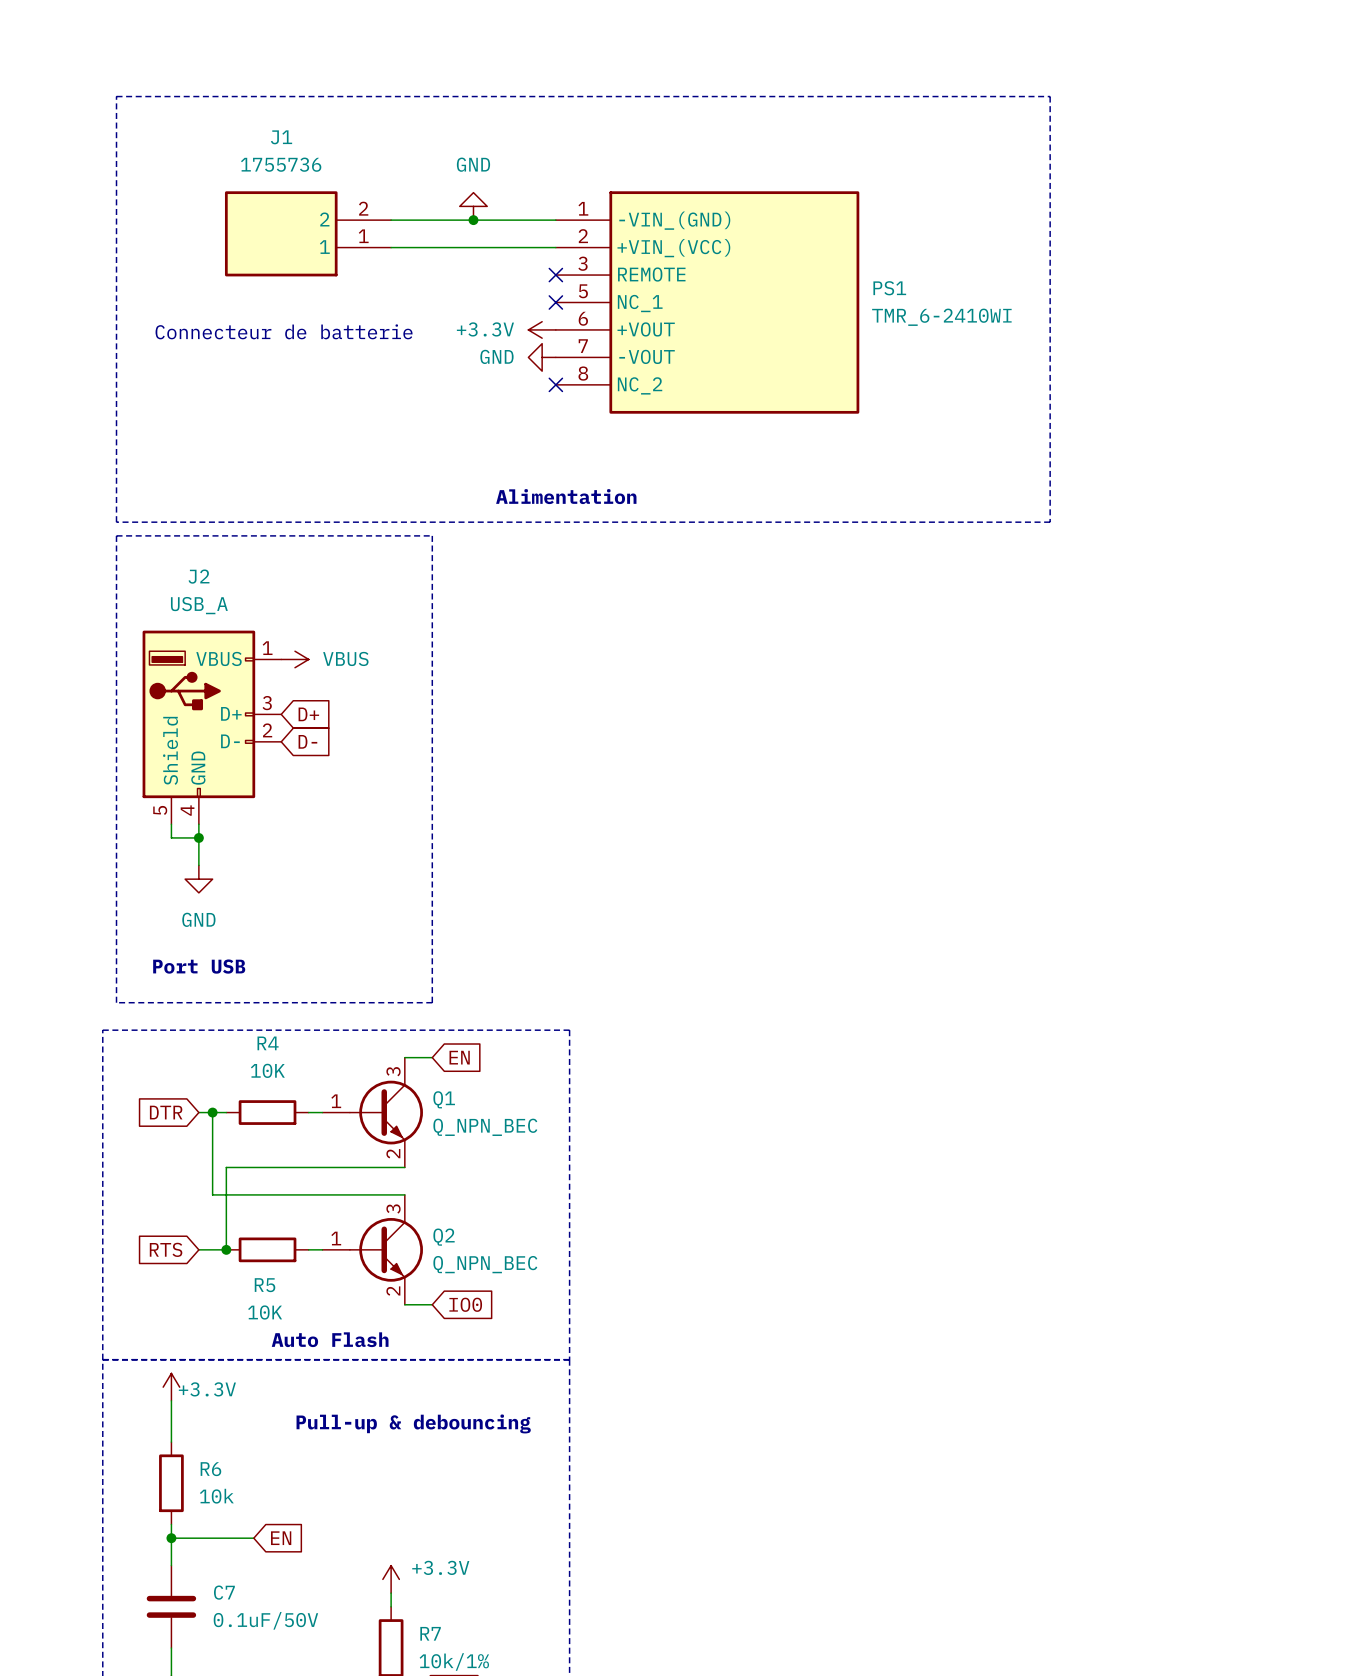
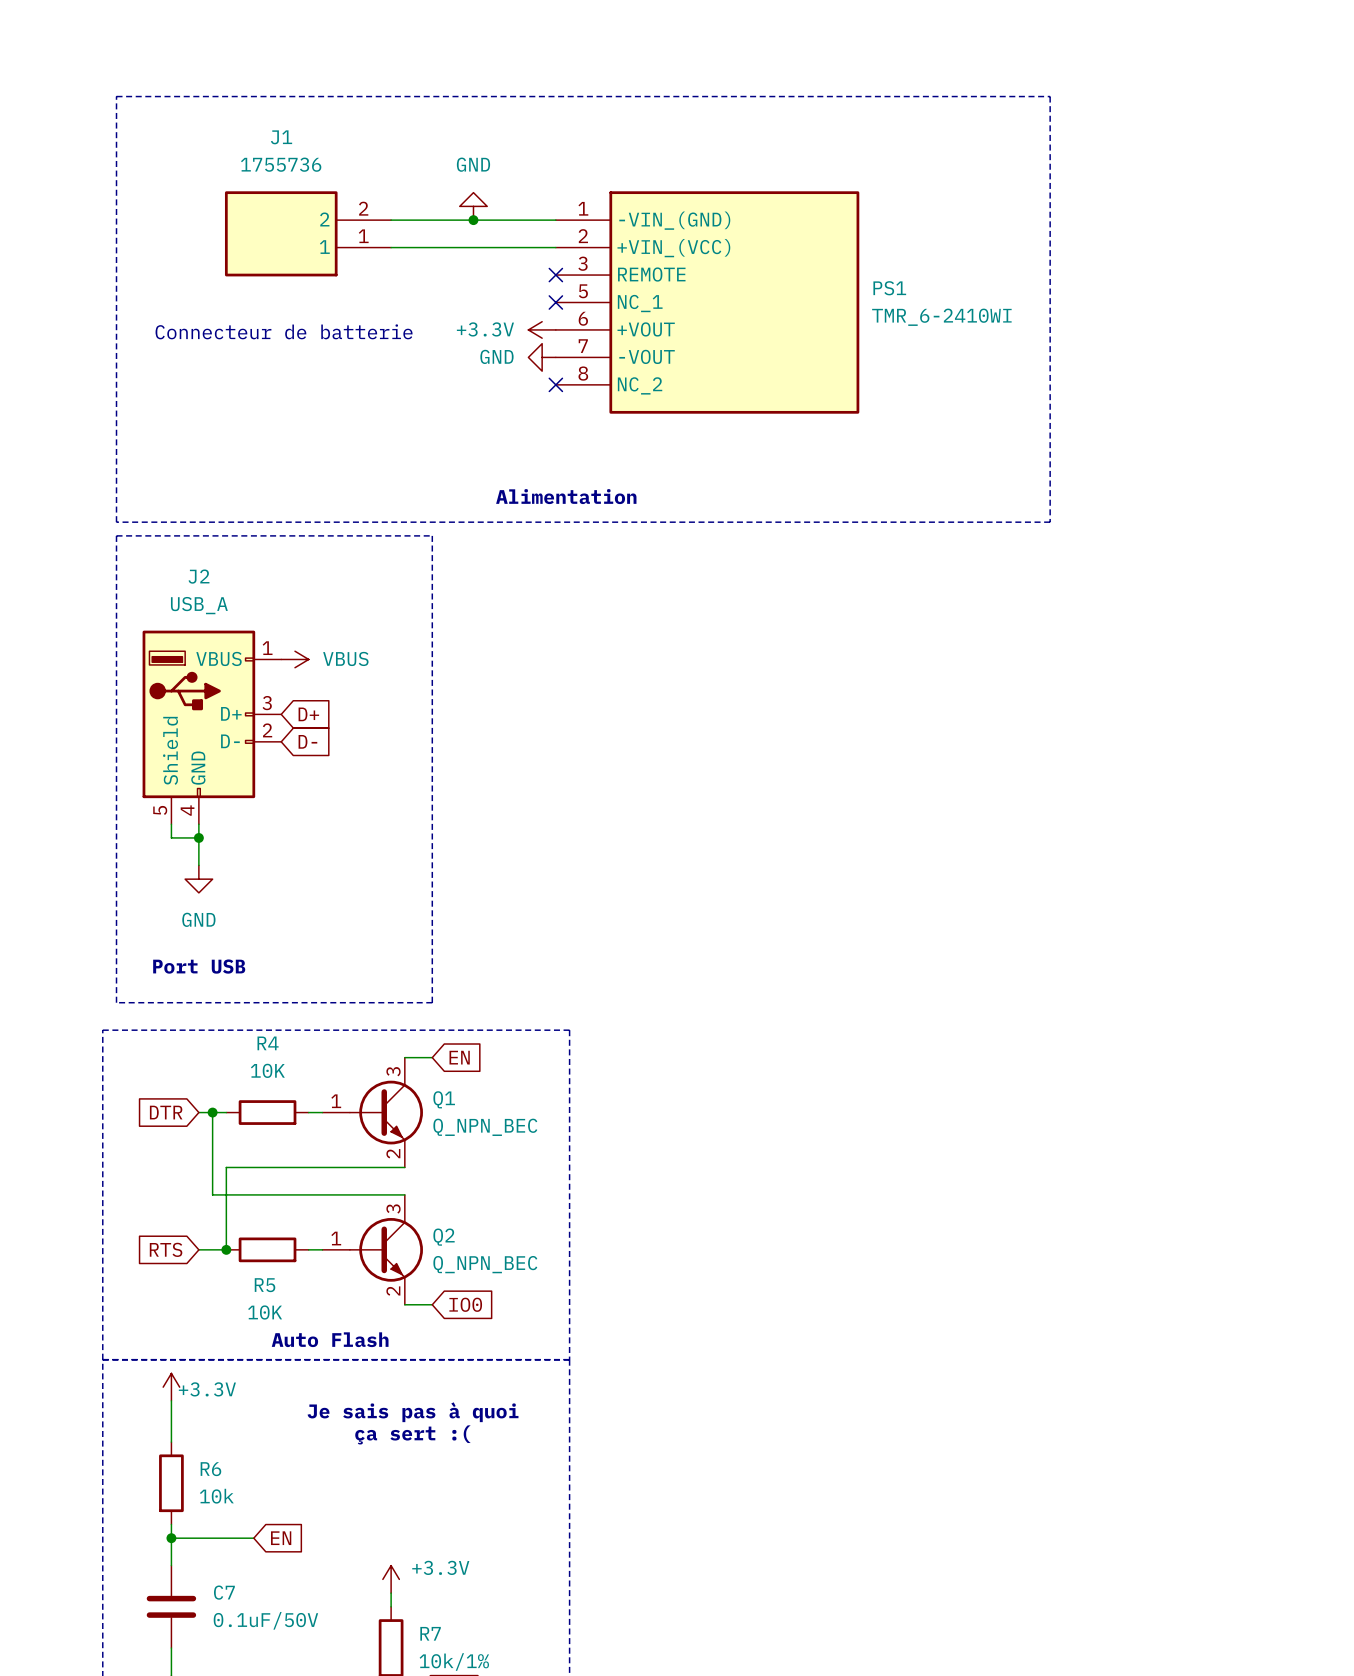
text: none -> Je sais pas à quoi (413, 1412)
text: Pull-up & debouncing (413, 1423) -> none
text: none -> ça sert :( (412, 1434)

